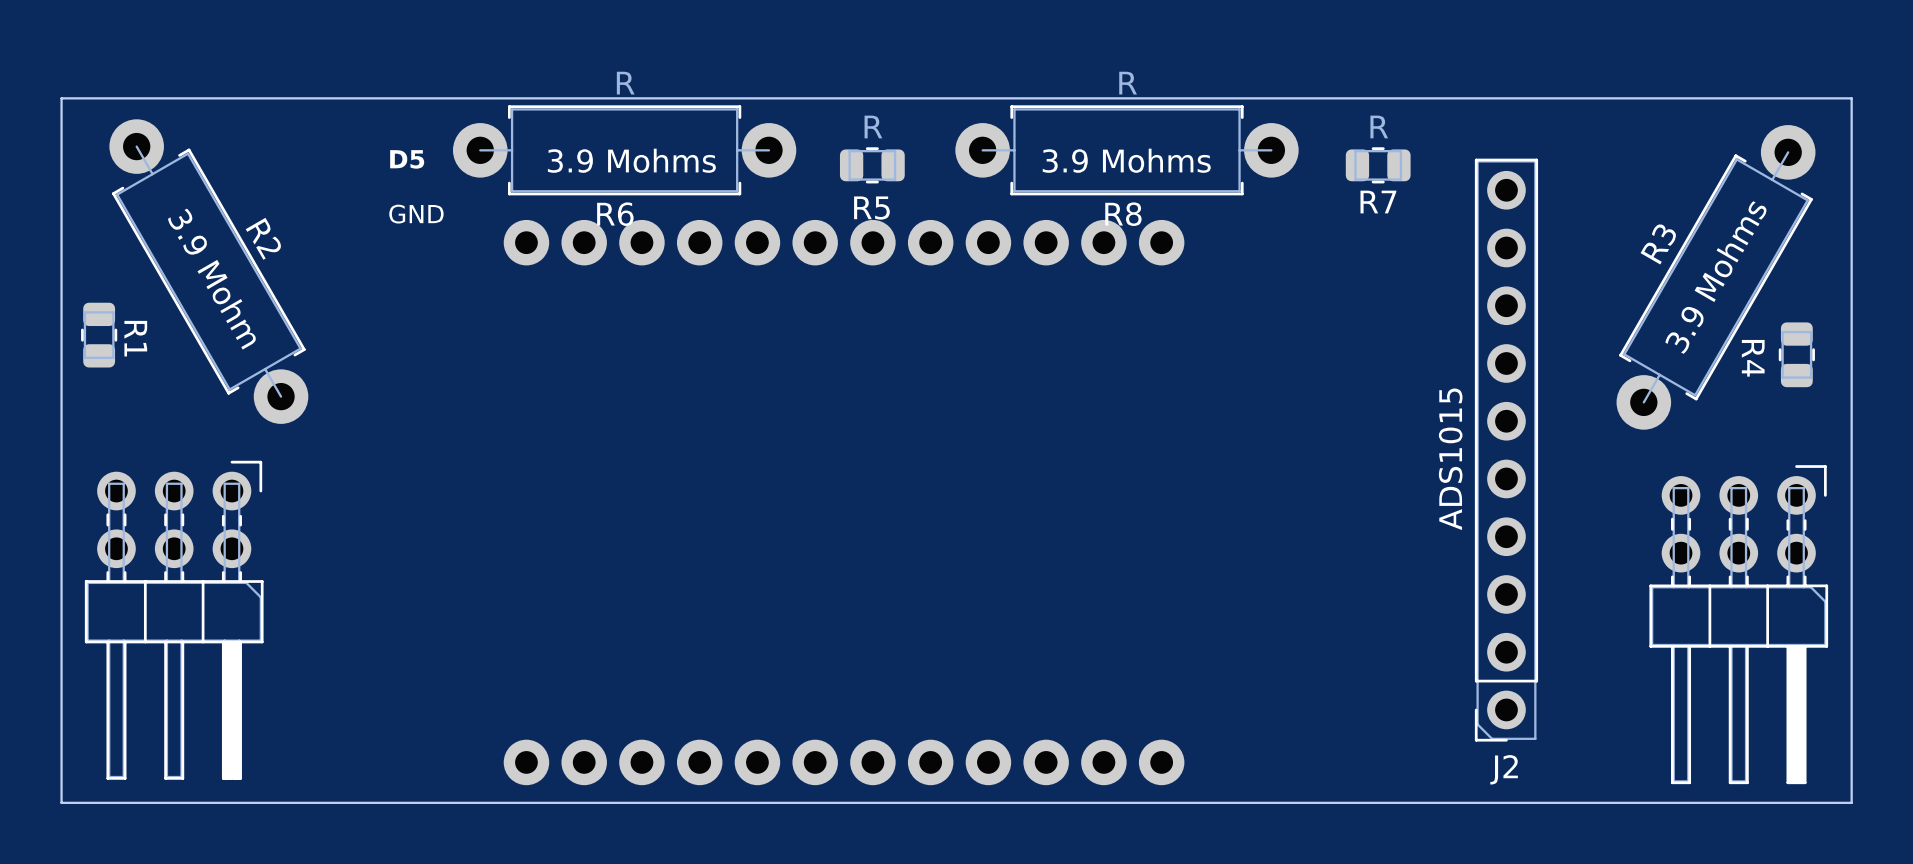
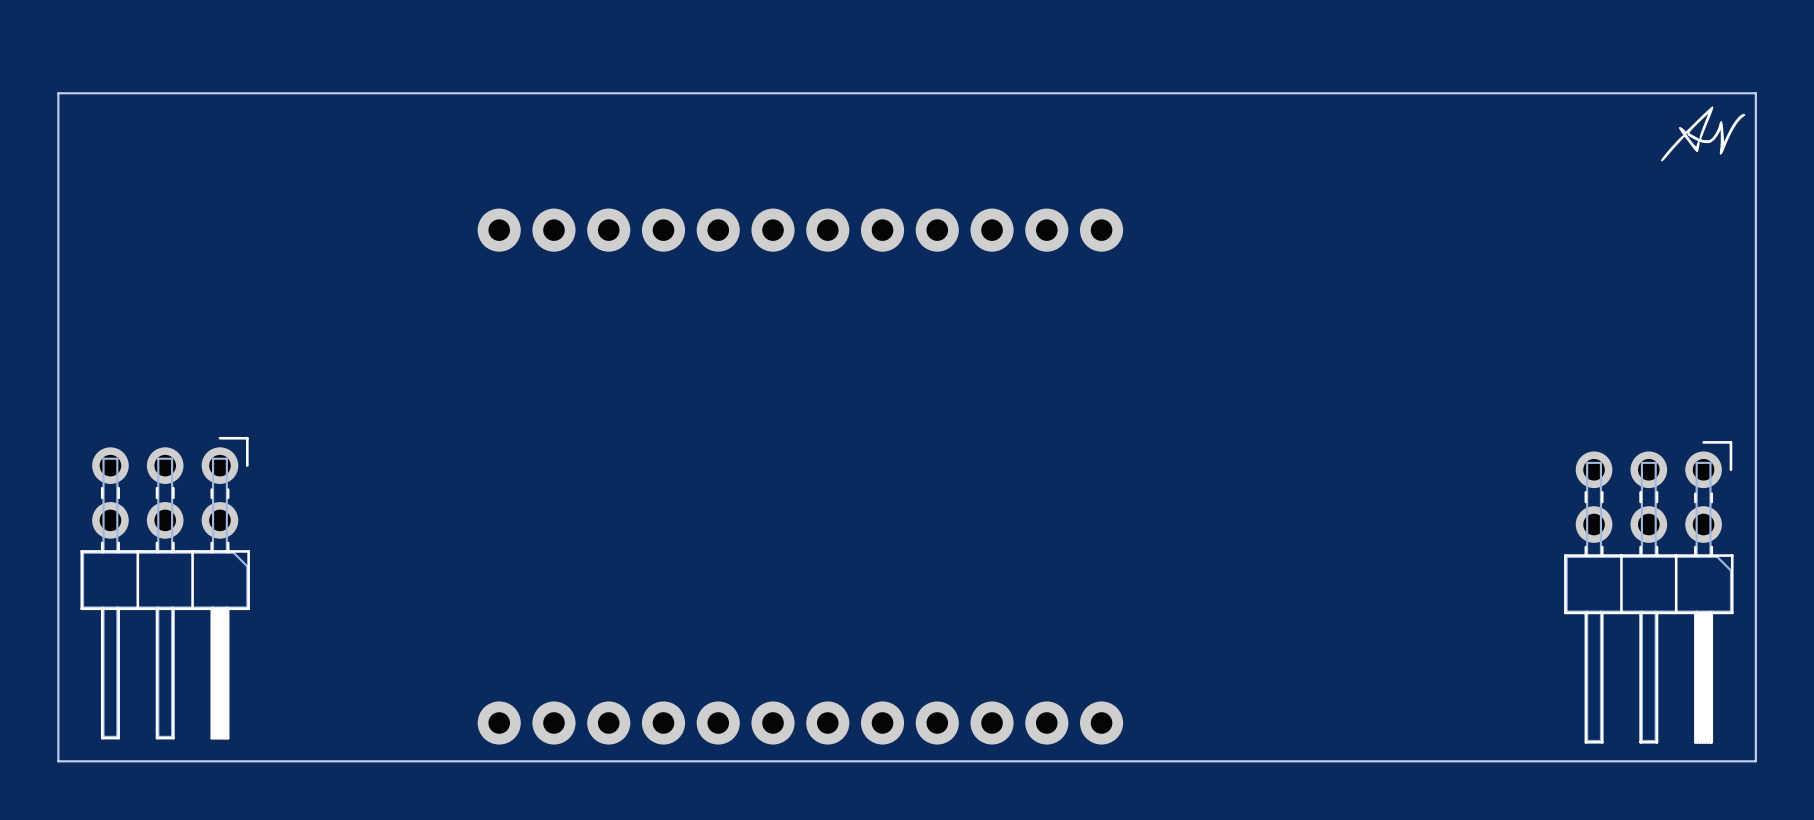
drawing: none -> [1661, 106, 1746, 162]
R6: R (624, 150) -> none
R8: R (1127, 150) -> none
text: D5 (407, 159) -> none
text: 3.9 Mohms (631, 160) -> none
text: 3.9 Mohms (1126, 160) -> none
R5: R (872, 165) -> none
R7: R (1378, 165) -> none
text: GND (416, 214) -> none
R2: (208, 271) -> none
text: 3.9 Mohms (1715, 277) -> none
R3: (1716, 277) -> none
text: 3.9 Mohm (212, 279) -> none
R1: (99, 335) -> none
R4: (1796, 354) -> none
J2: (1506, 450) -> none
text: ADS1015 (1450, 459) -> none

